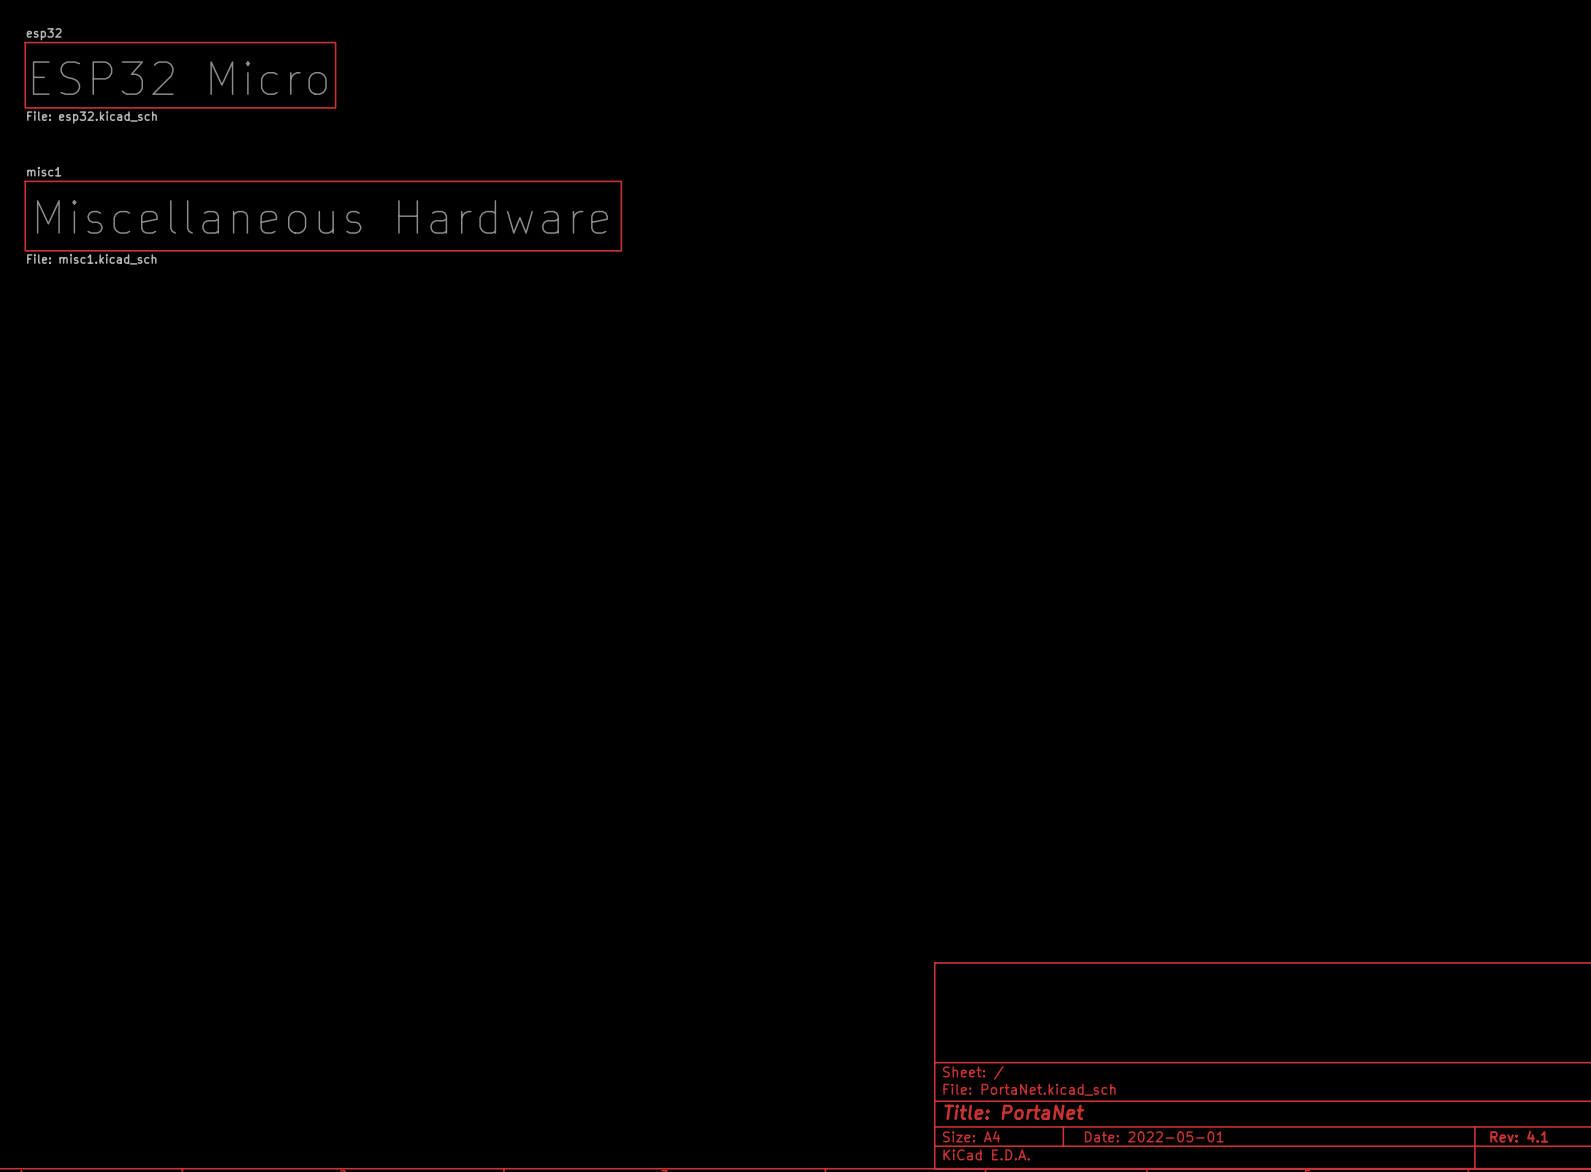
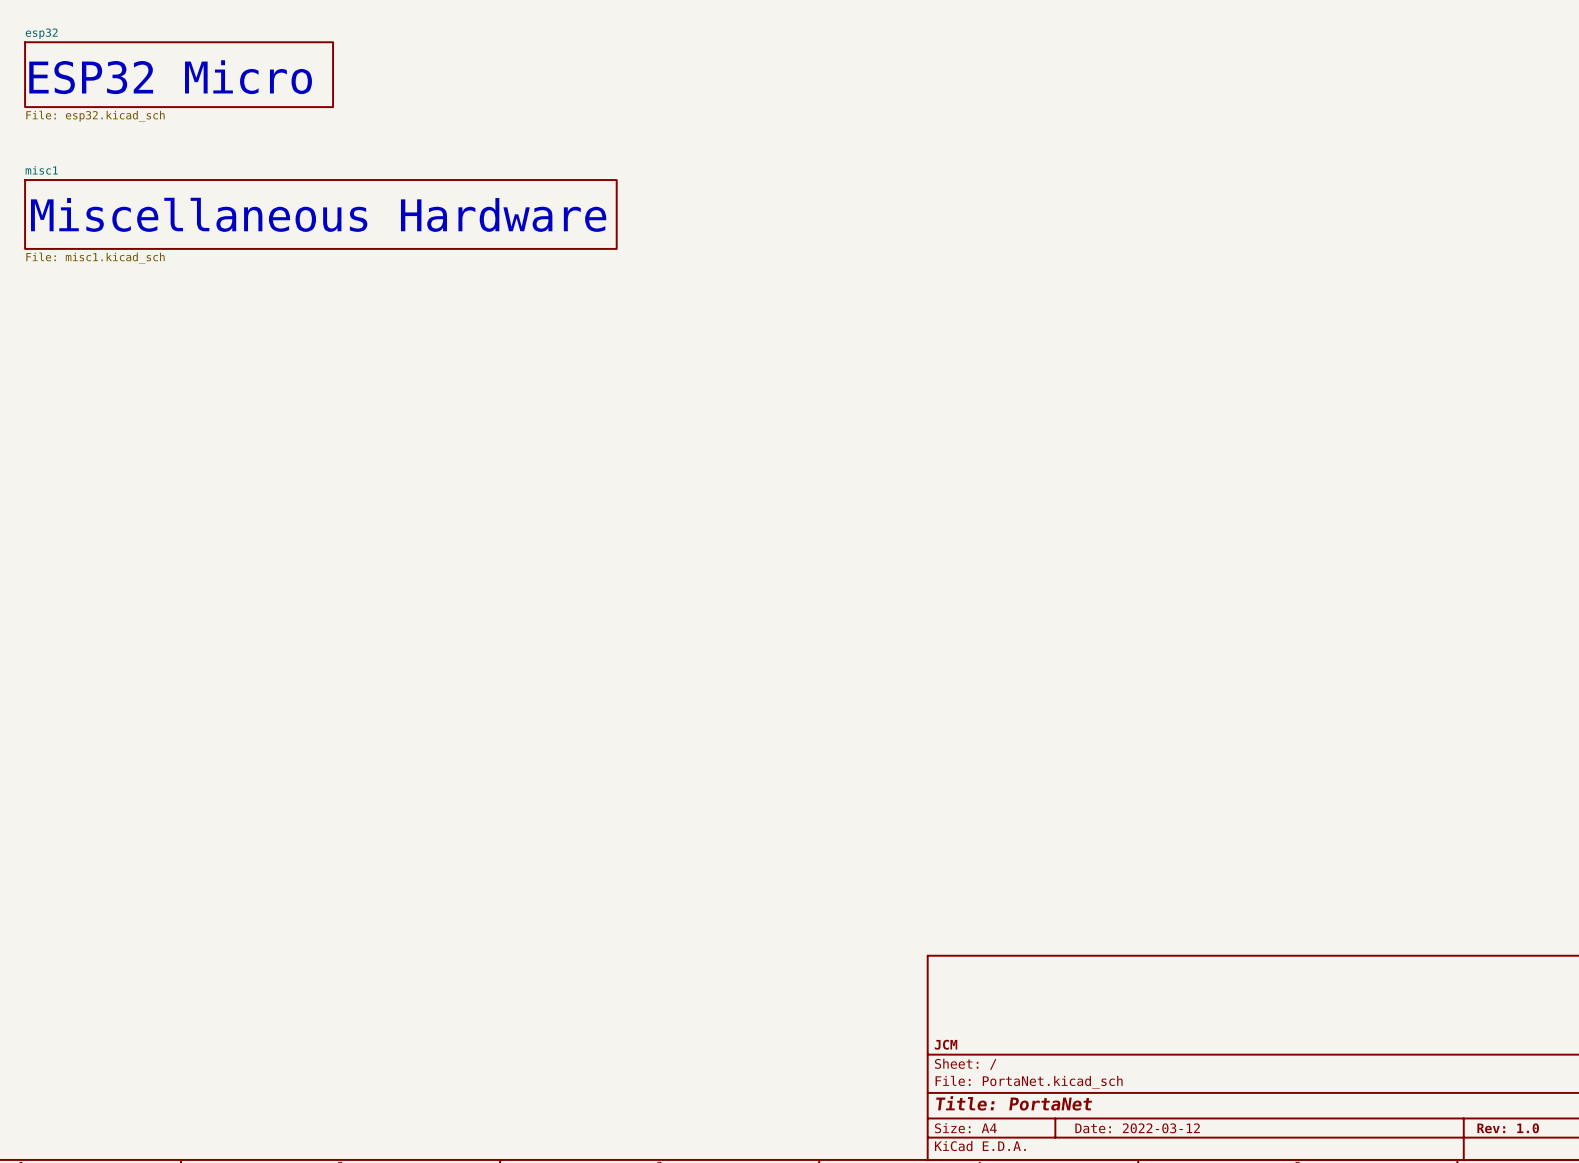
title block: none -> JCM (946, 1044)
title block: Date: 2022-05-01 (1154, 1136) -> Date: 2022-03-12 (1137, 1128)
title block: Rev: 4.1 (1519, 1136) -> Rev: 1.0 (1508, 1128)

